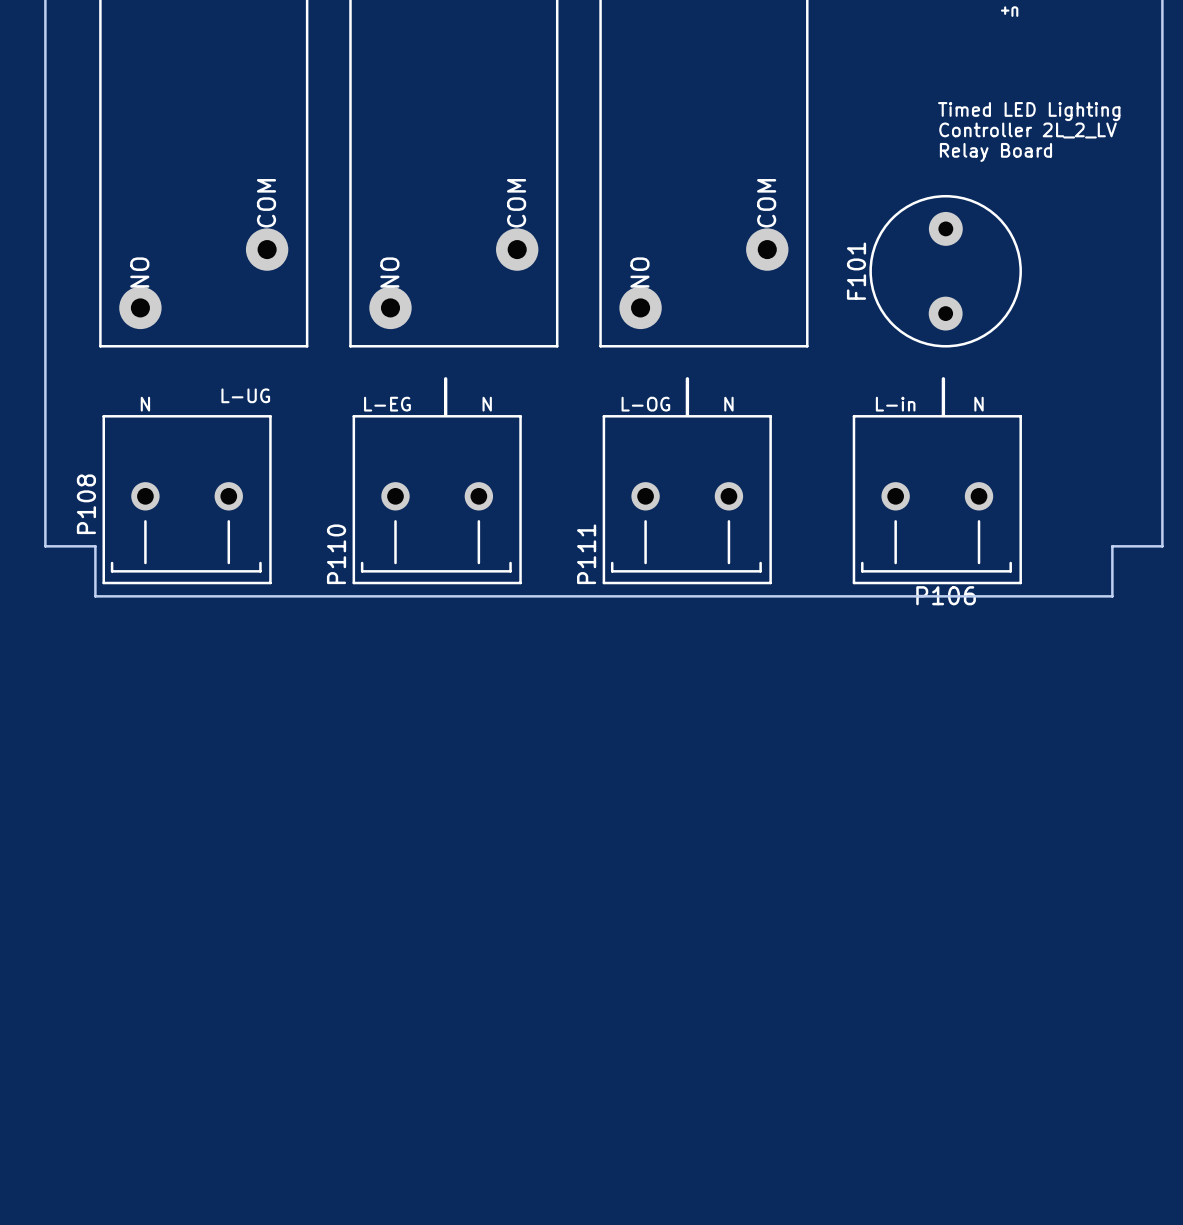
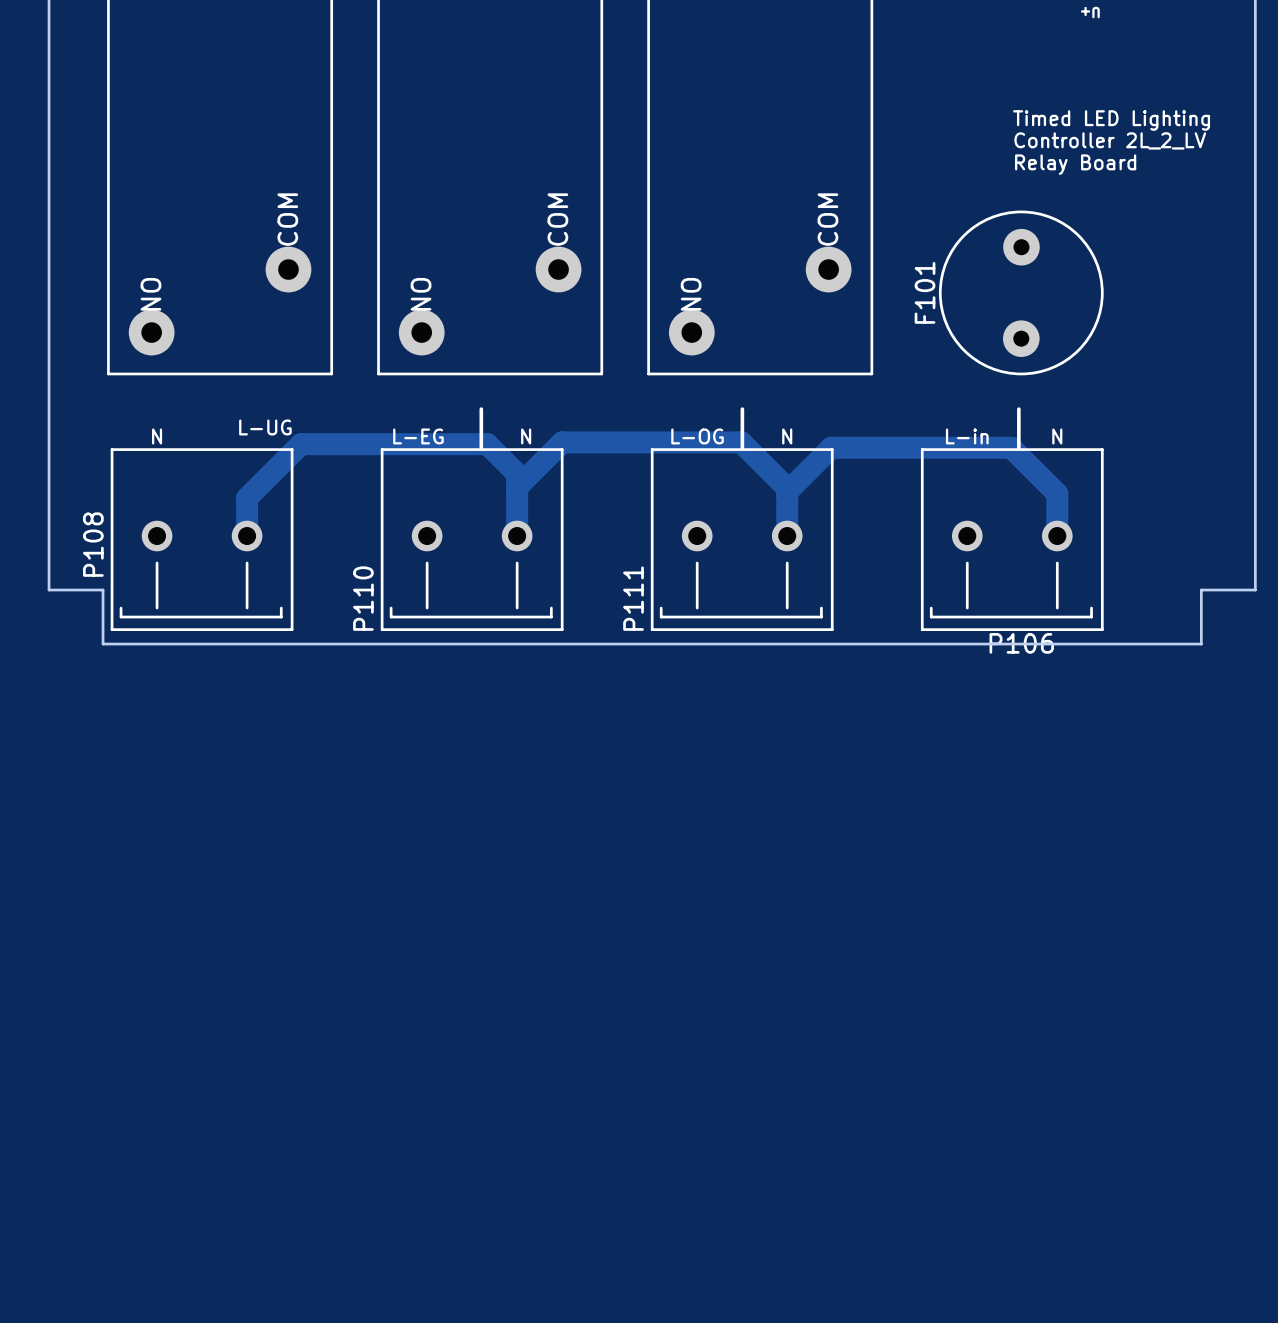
track: none -> (517, 487) (562, 442) (741, 442) (787, 488) (787, 536)
track: none -> (787, 491) (831, 447) (1011, 447) (1057, 493) (1057, 536)
track: none -> (247, 536) (247, 498) (301, 444) (487, 444) (517, 473) (517, 536)

